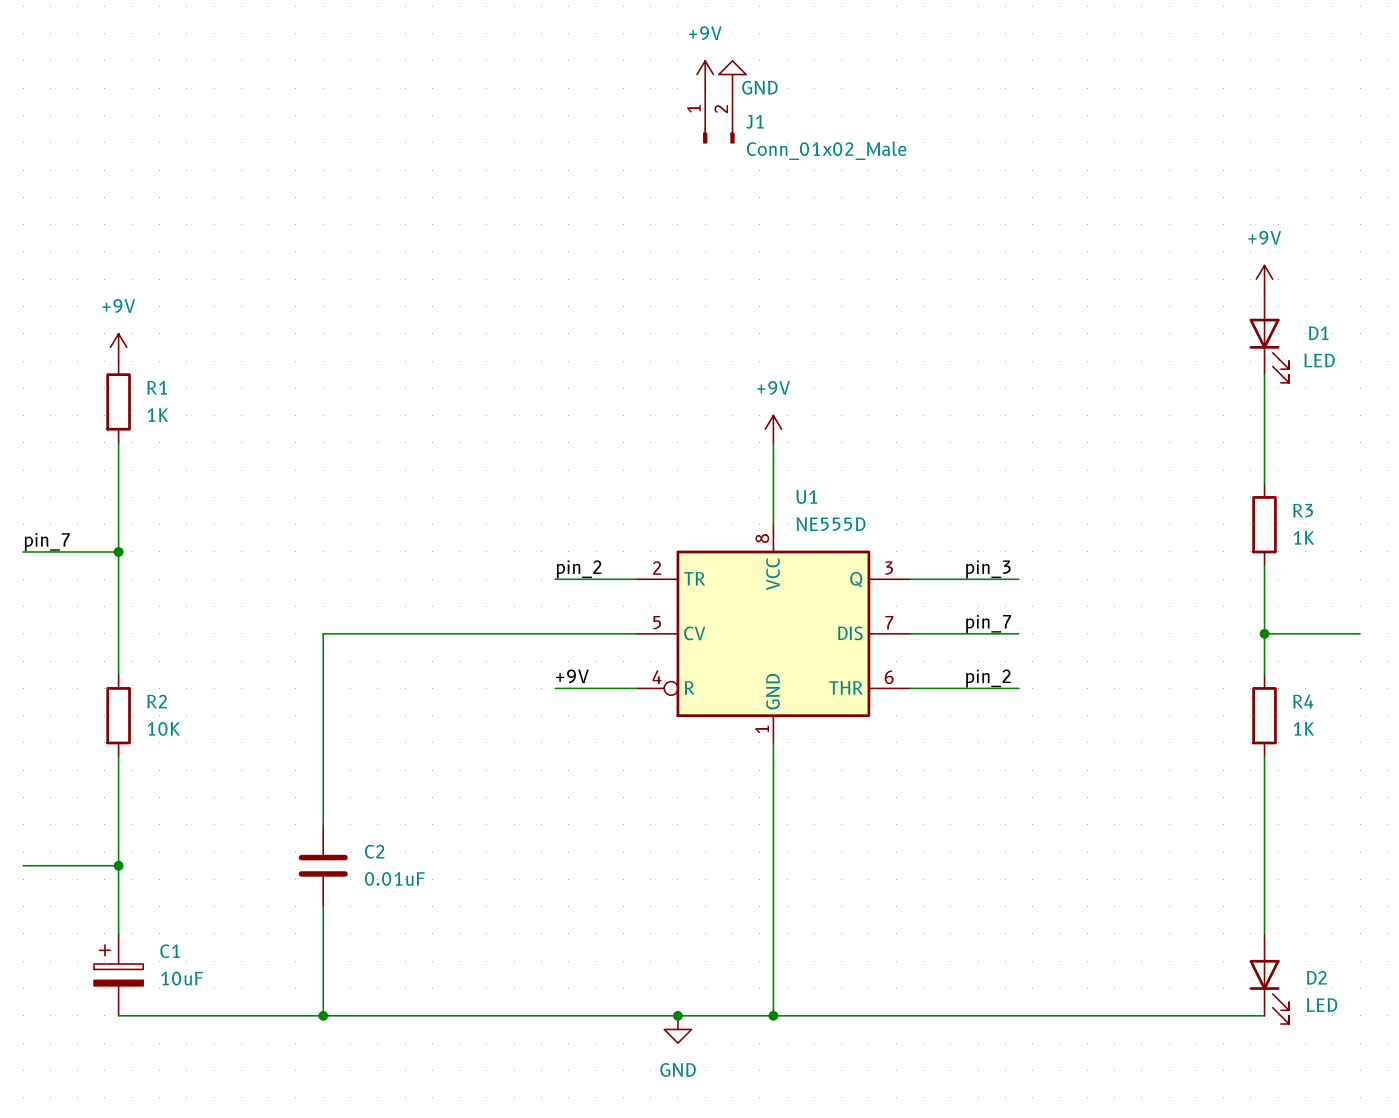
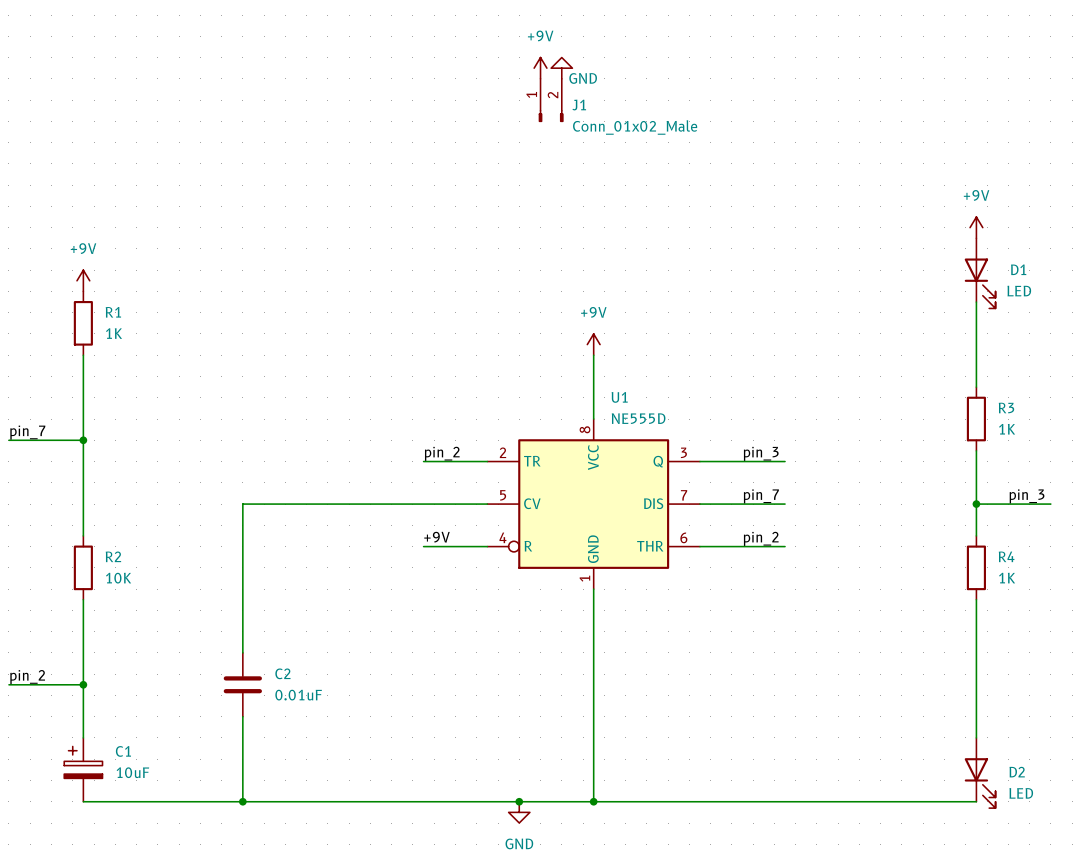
label: none -> pin_3 (1027, 496)
label: none -> pin_2 (27, 677)

